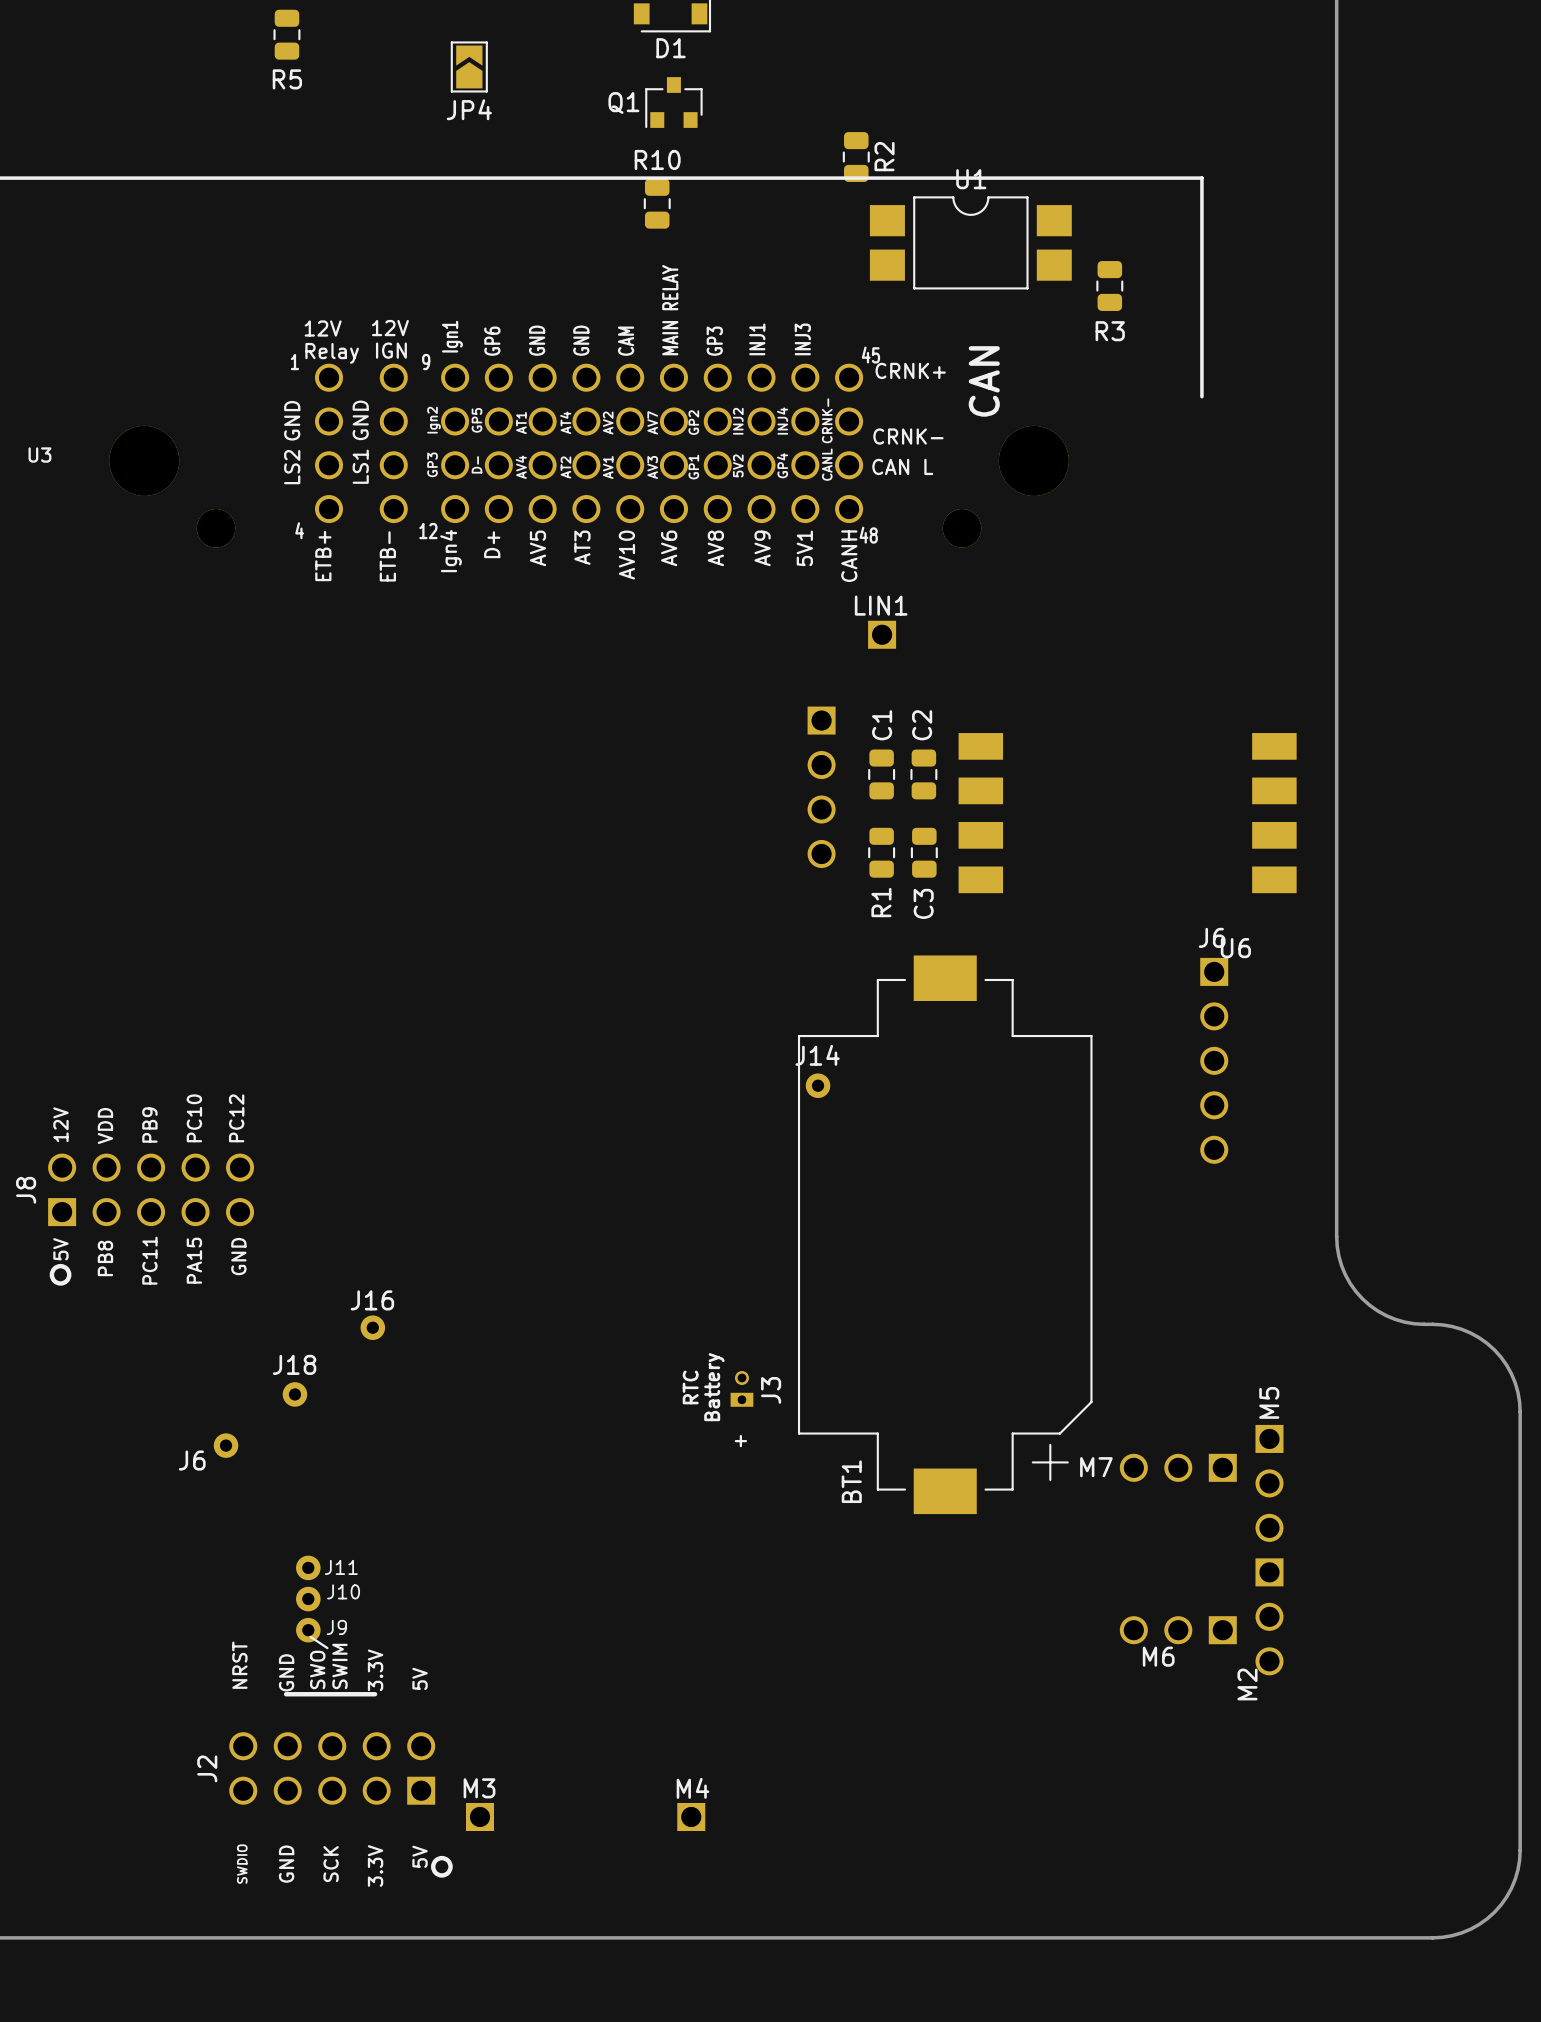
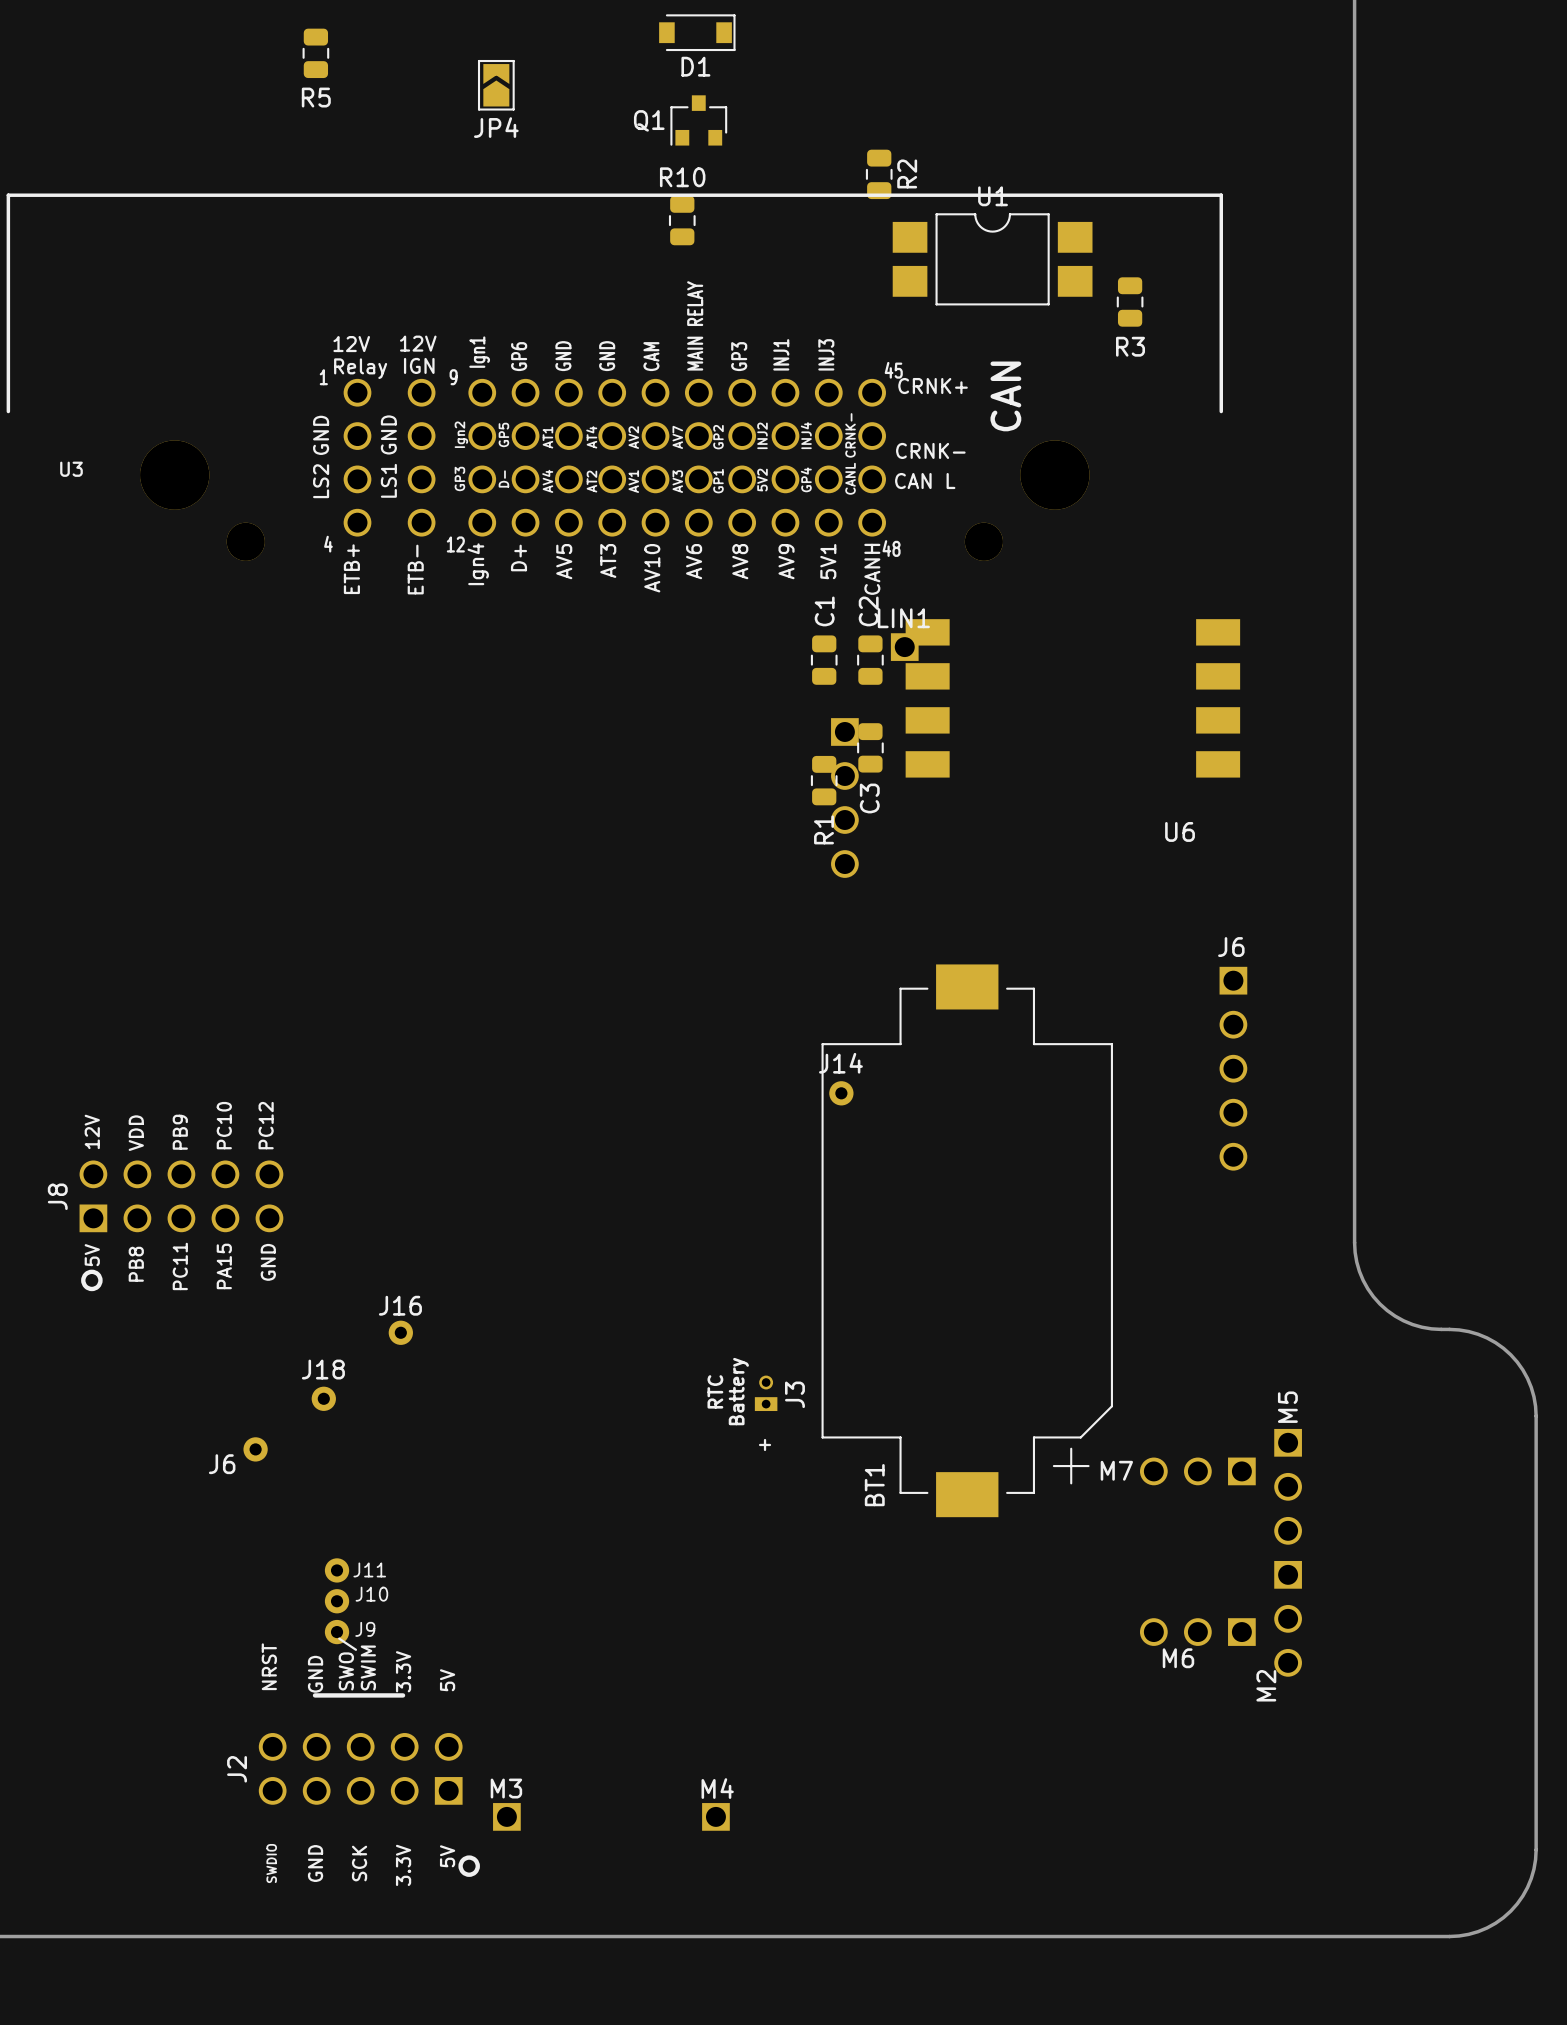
C1 position: (881, 774) -> (824, 660)
C2 position: (923, 774) -> (870, 660)
U6 position: (1127, 813) -> (1072, 698)
R1 position: (881, 852) -> (824, 780)
C3 position: (924, 852) -> (870, 747)

